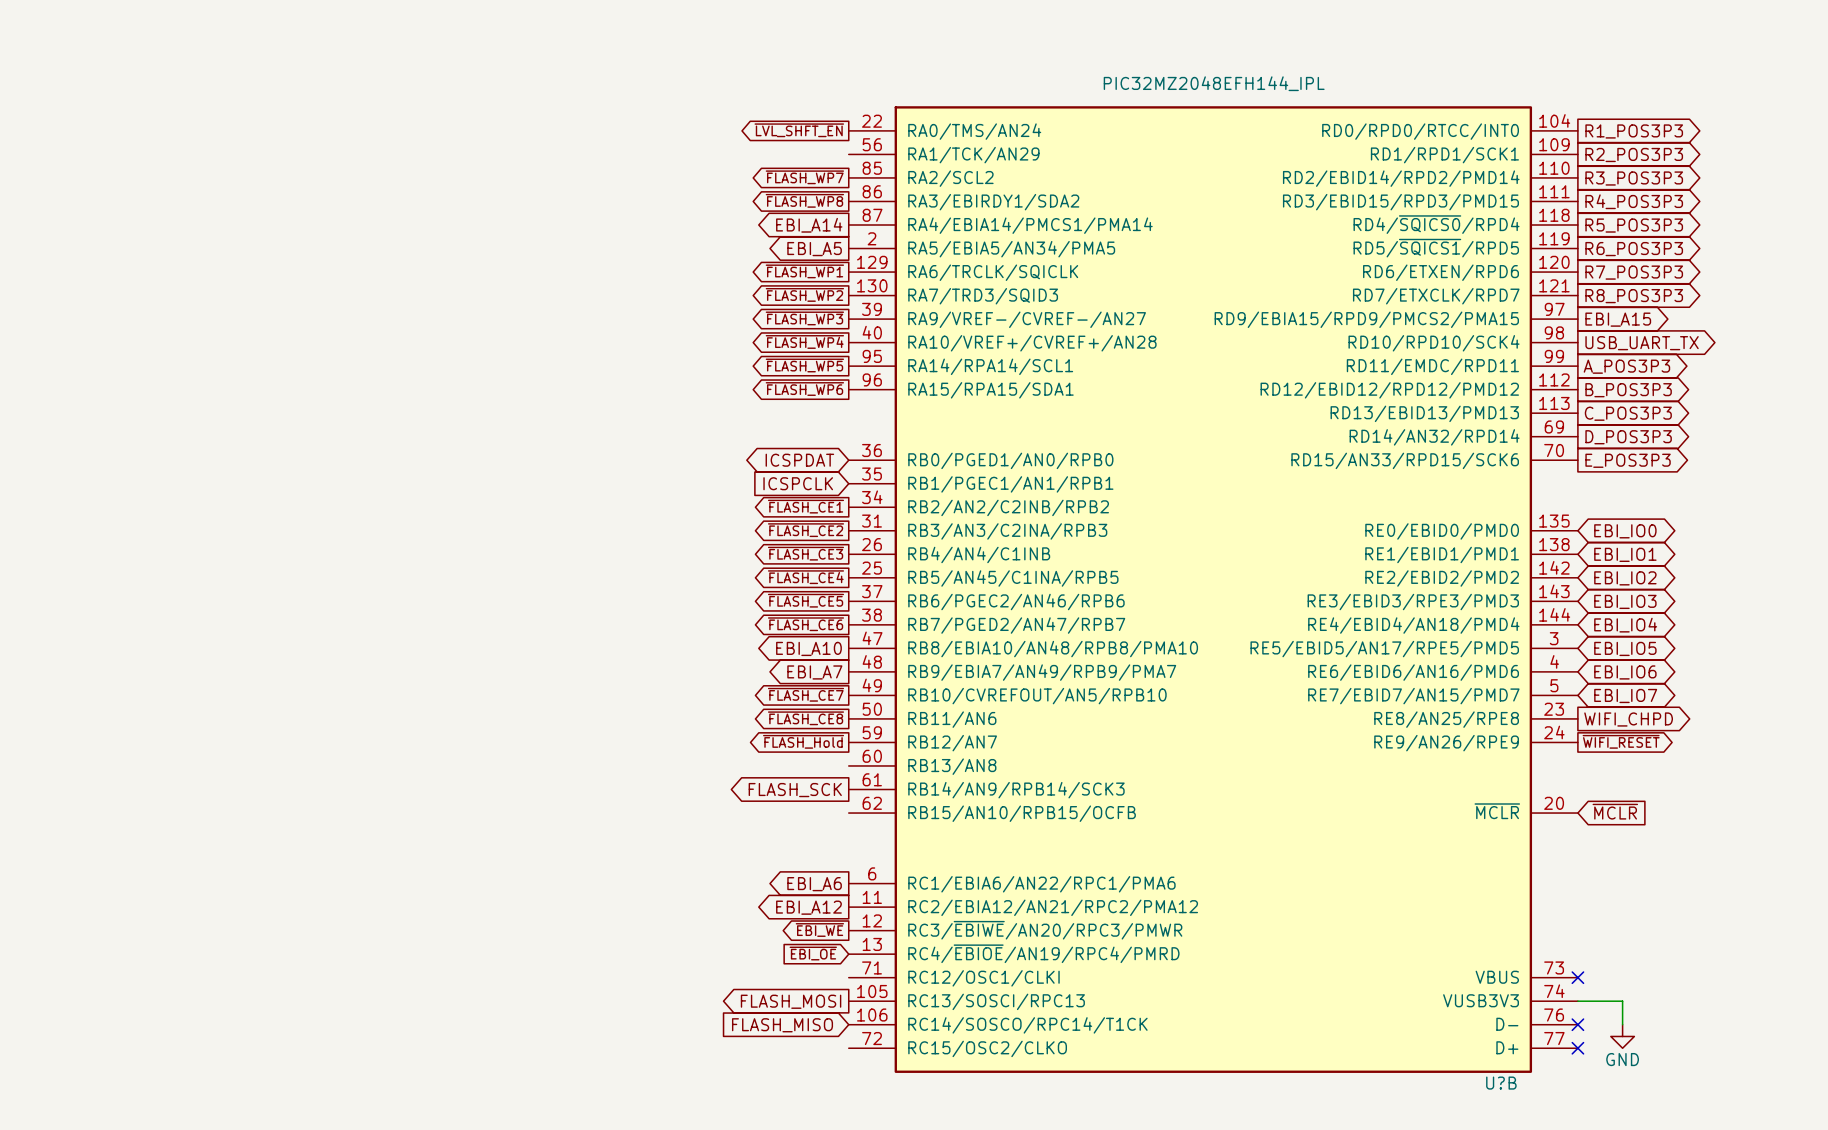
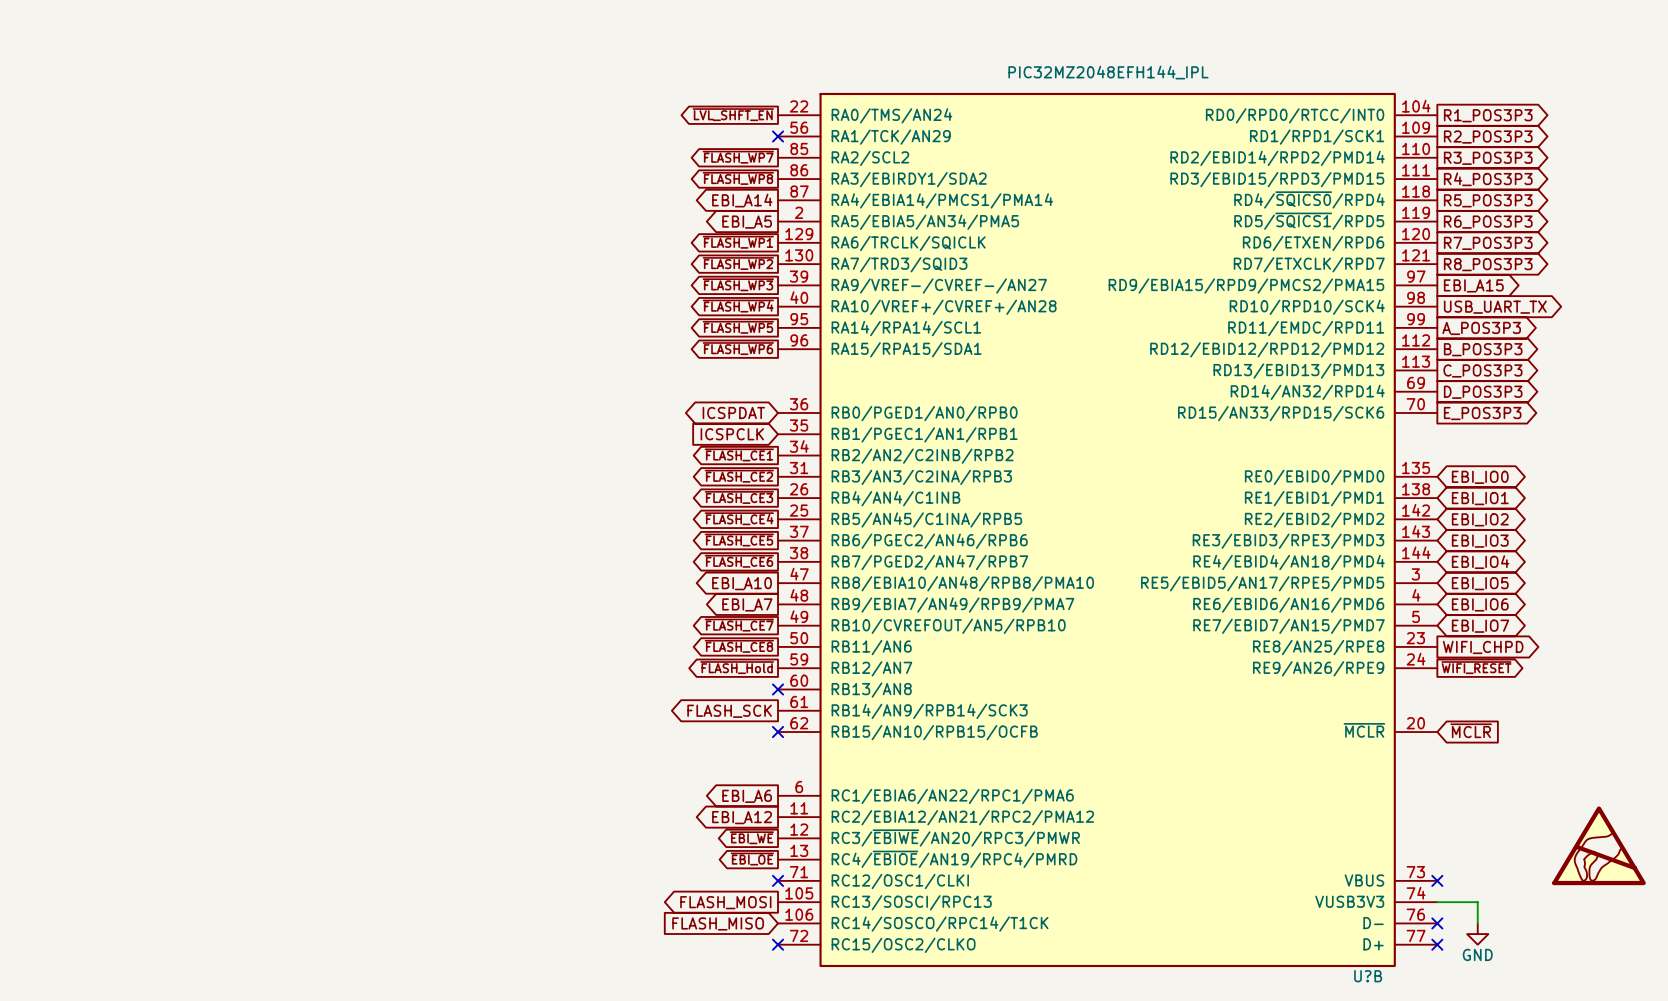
no-connect mark: none -> (778, 136)
no-connect mark: none -> (778, 689)
no-connect mark: none -> (778, 732)
power symbol: none -> (1598, 845)
global label shape: input (813, 953) -> output (752, 859)
no-connect mark: none -> (778, 880)
no-connect mark: none -> (778, 944)

